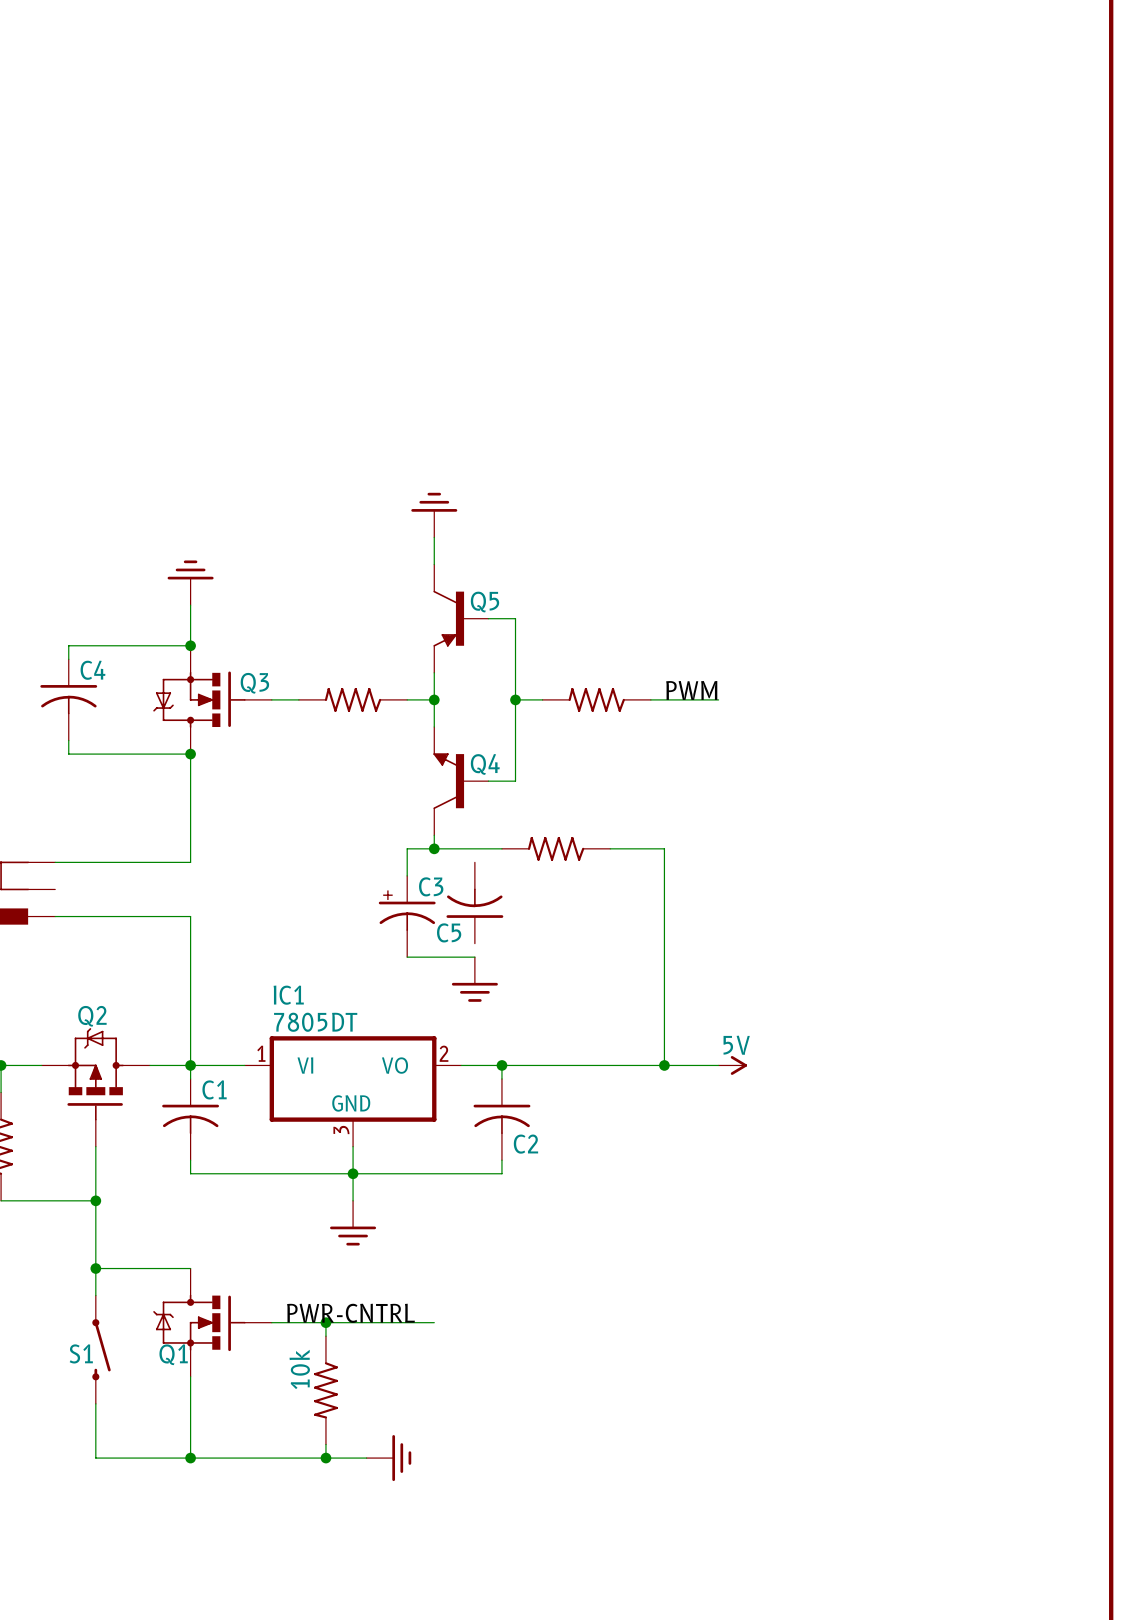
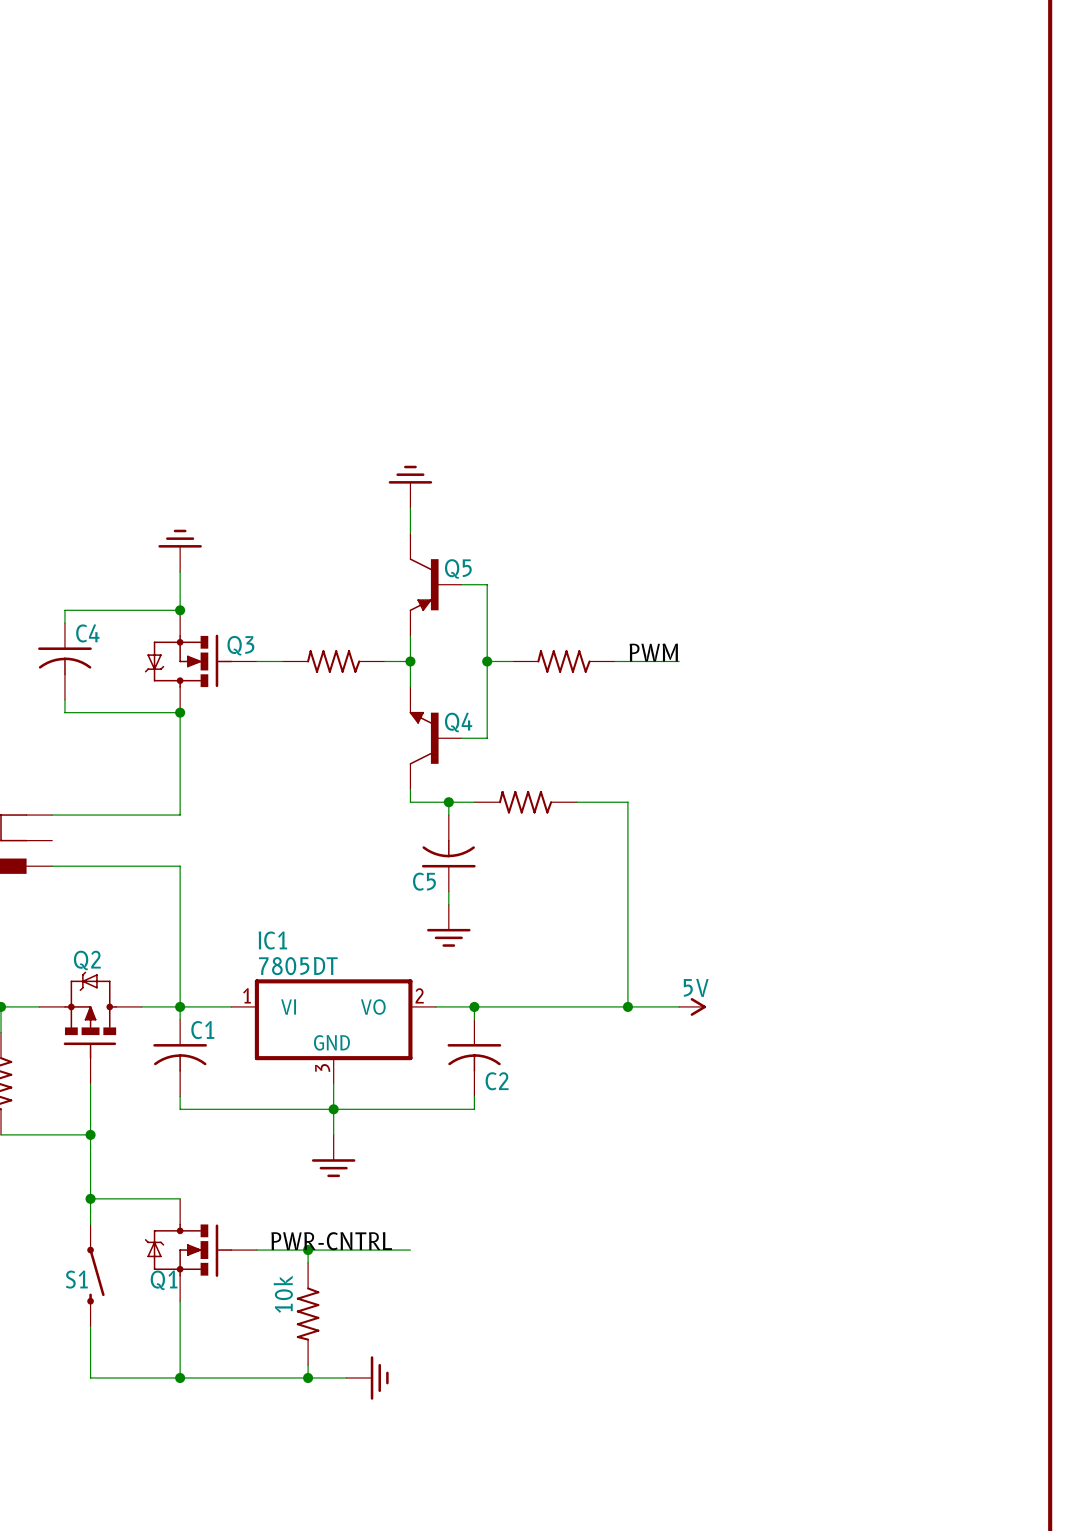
wire: (434, 848) (407, 848) (407, 875) -> none
junction position: (434, 848) -> (448, 802)
wire: none -> (448, 802) (448, 815)
C3: (407, 916) -> none
wire: (407, 957) (474, 957) -> (448, 891) (448, 904)

